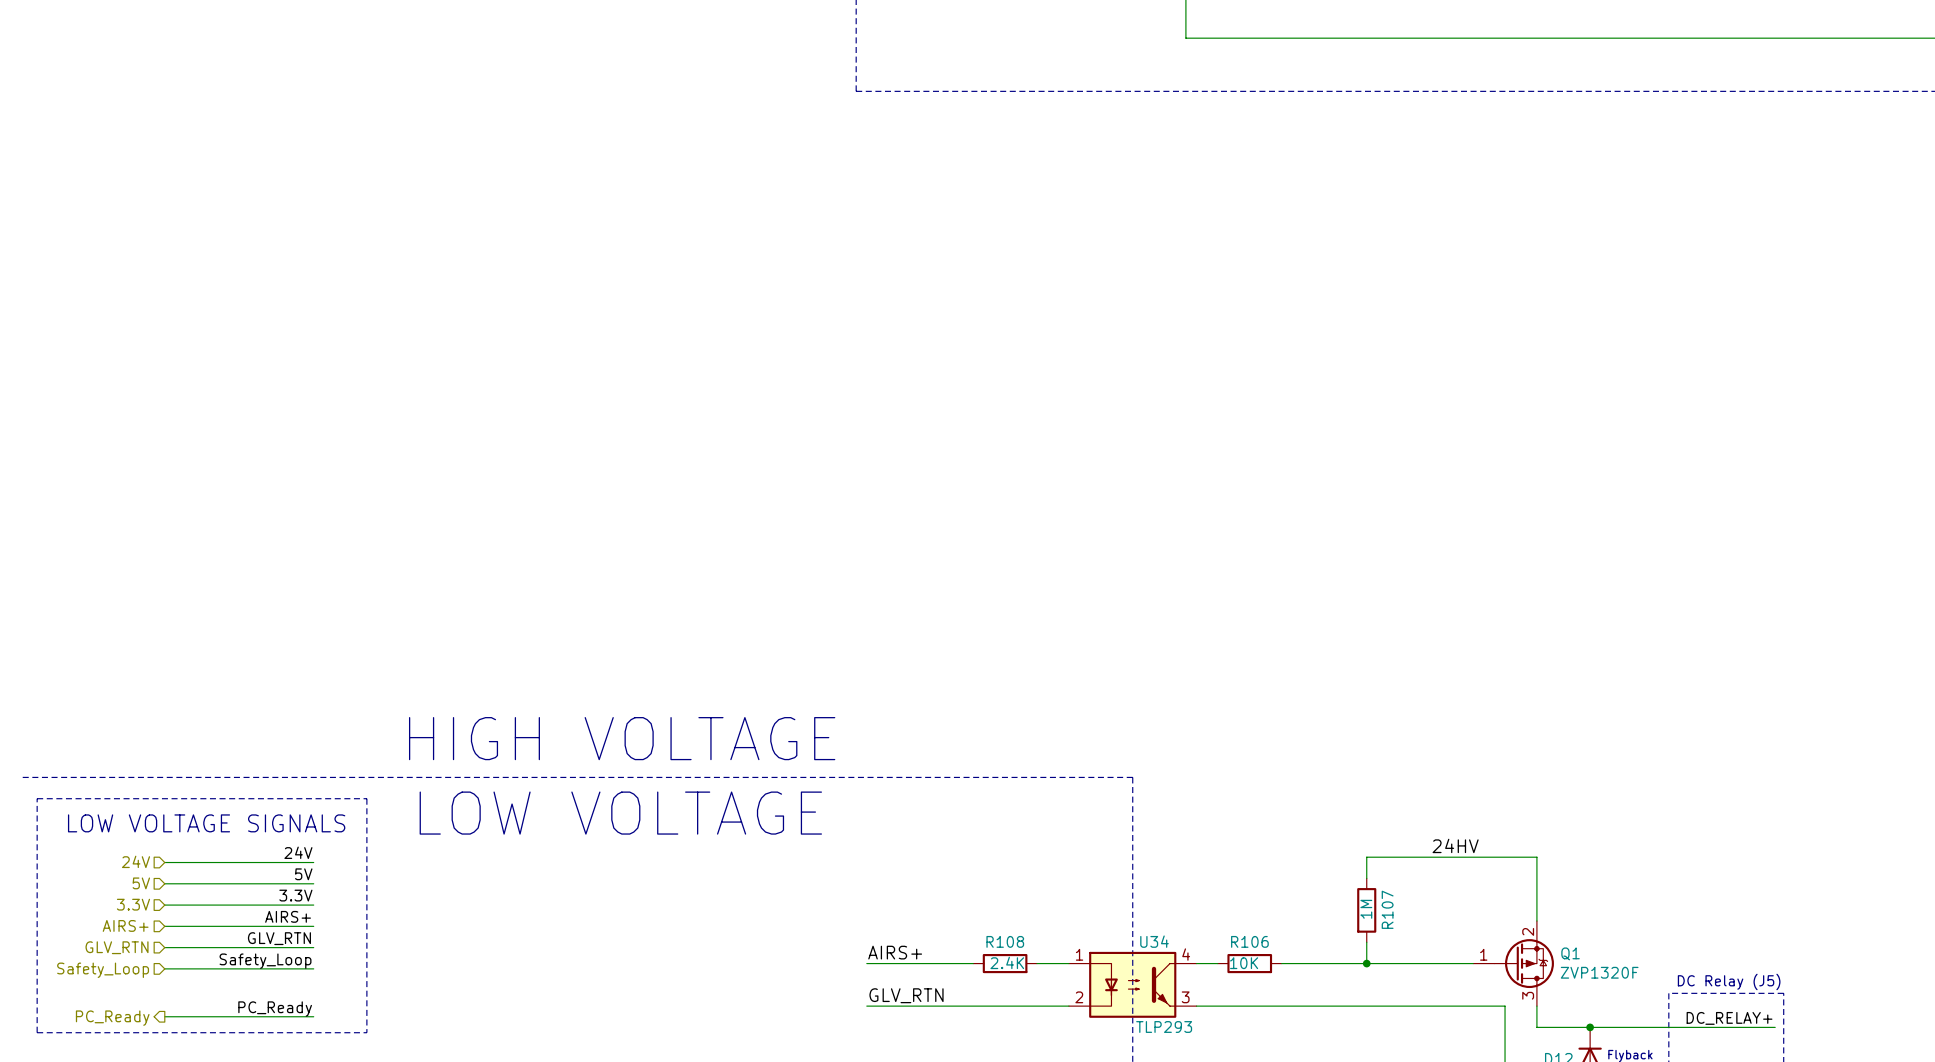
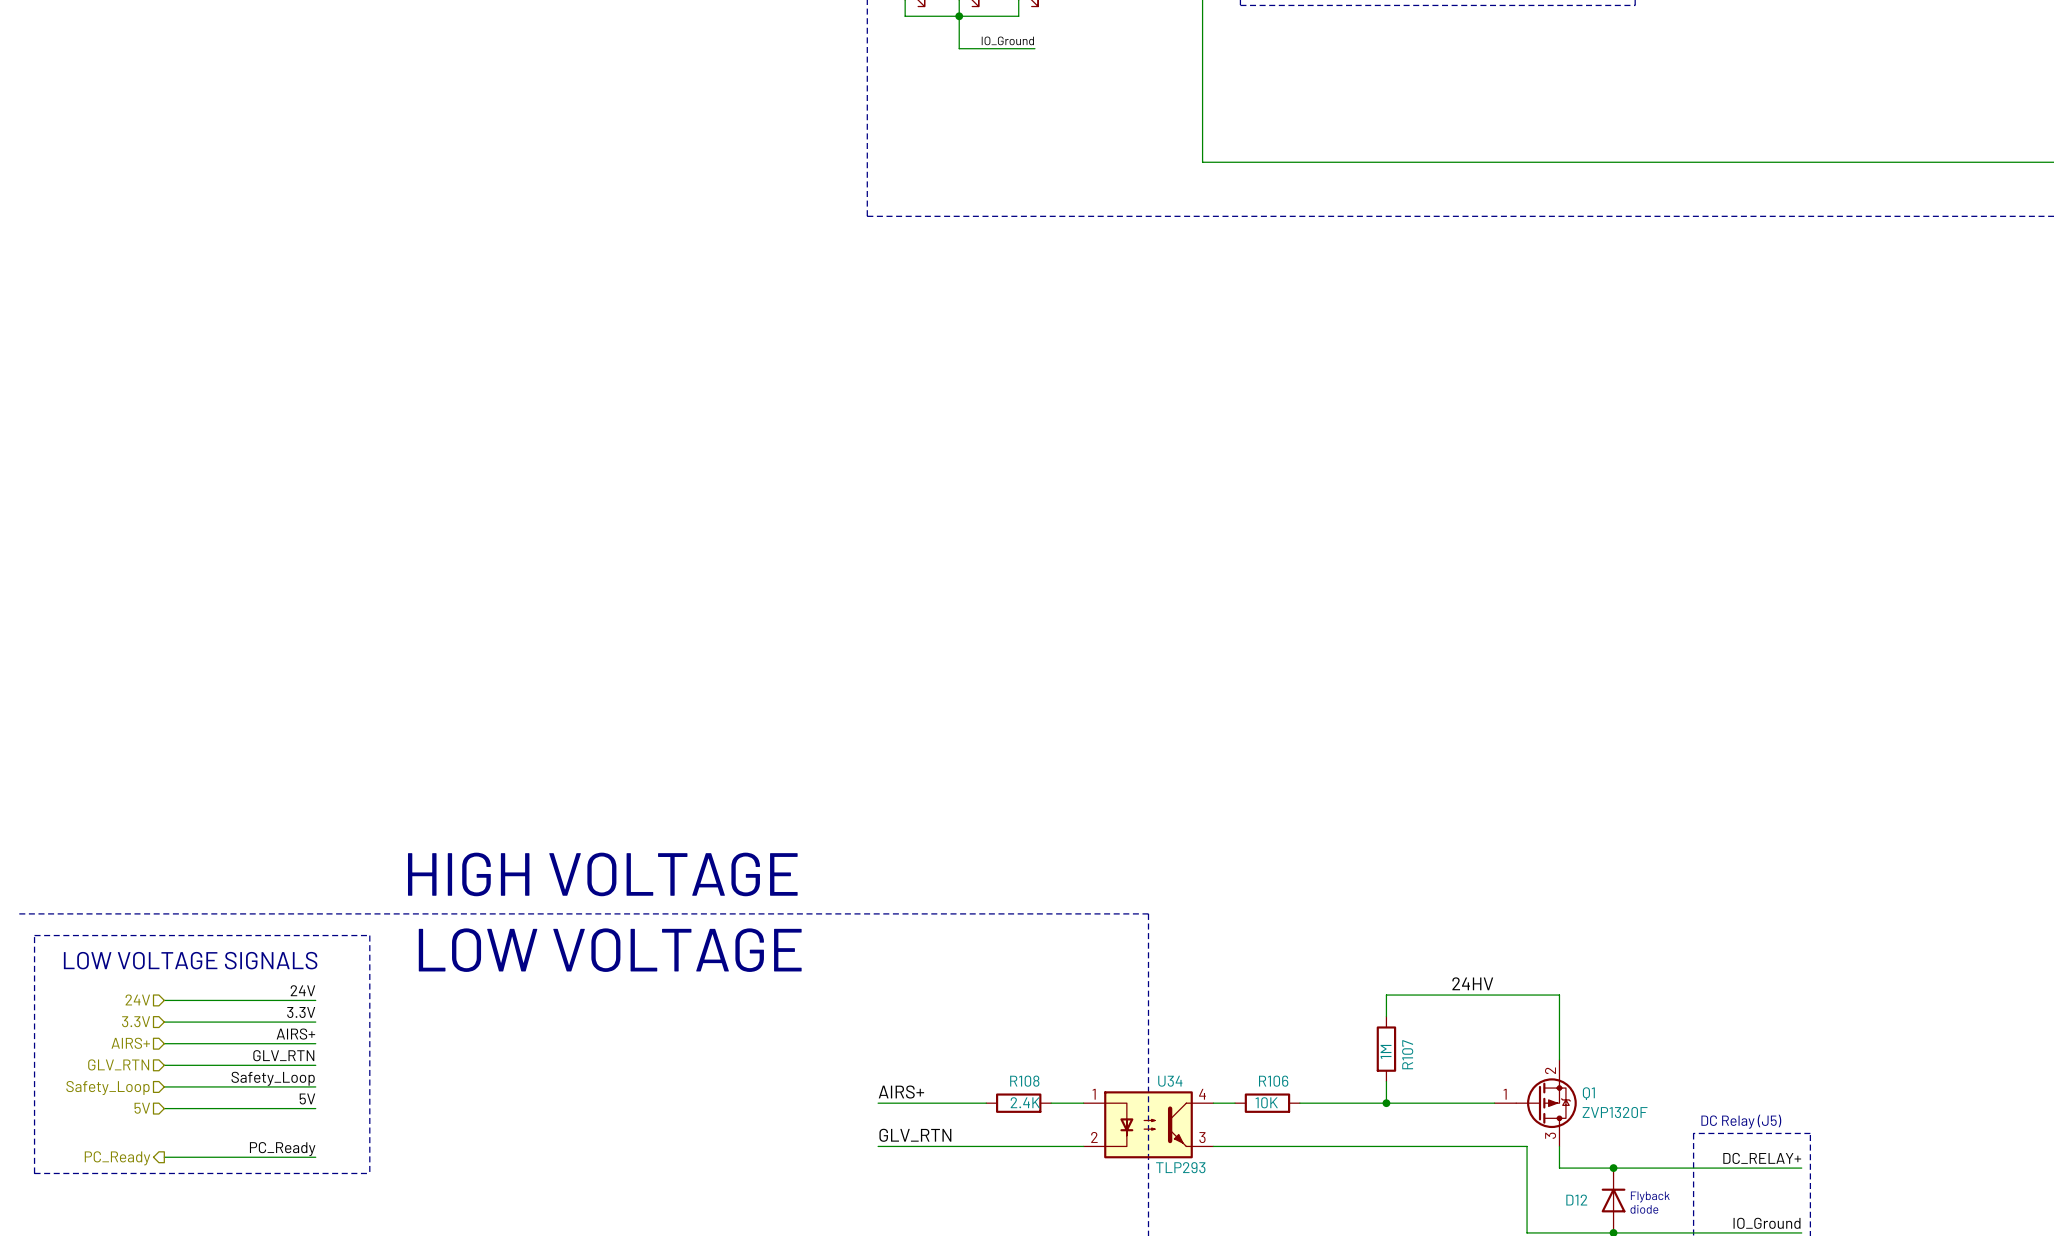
label: 5V (303, 874) -> 3.3V (301, 1012)
hierarchical label: 5V (141, 883) -> 3.3V (136, 1021)
label: 3.3V (295, 895) -> AIRS+ (295, 1034)
hierarchical label: 3.3V (133, 904) -> AIRS+ (130, 1043)
label: AIRS+ (288, 916) -> GLV_RTN (283, 1055)
hierarchical label: AIRS+ (125, 925) -> GLV_RTN (118, 1064)
label: GLV_RTN (279, 938) -> Safety_Loop (273, 1078)
hierarchical label: GLV_RTN (117, 947) -> Safety_Loop (107, 1088)
label: Safety_Loop (265, 961) -> 5V (307, 1098)
hierarchical label: Safety_Loop (103, 970) -> 5V (142, 1108)

